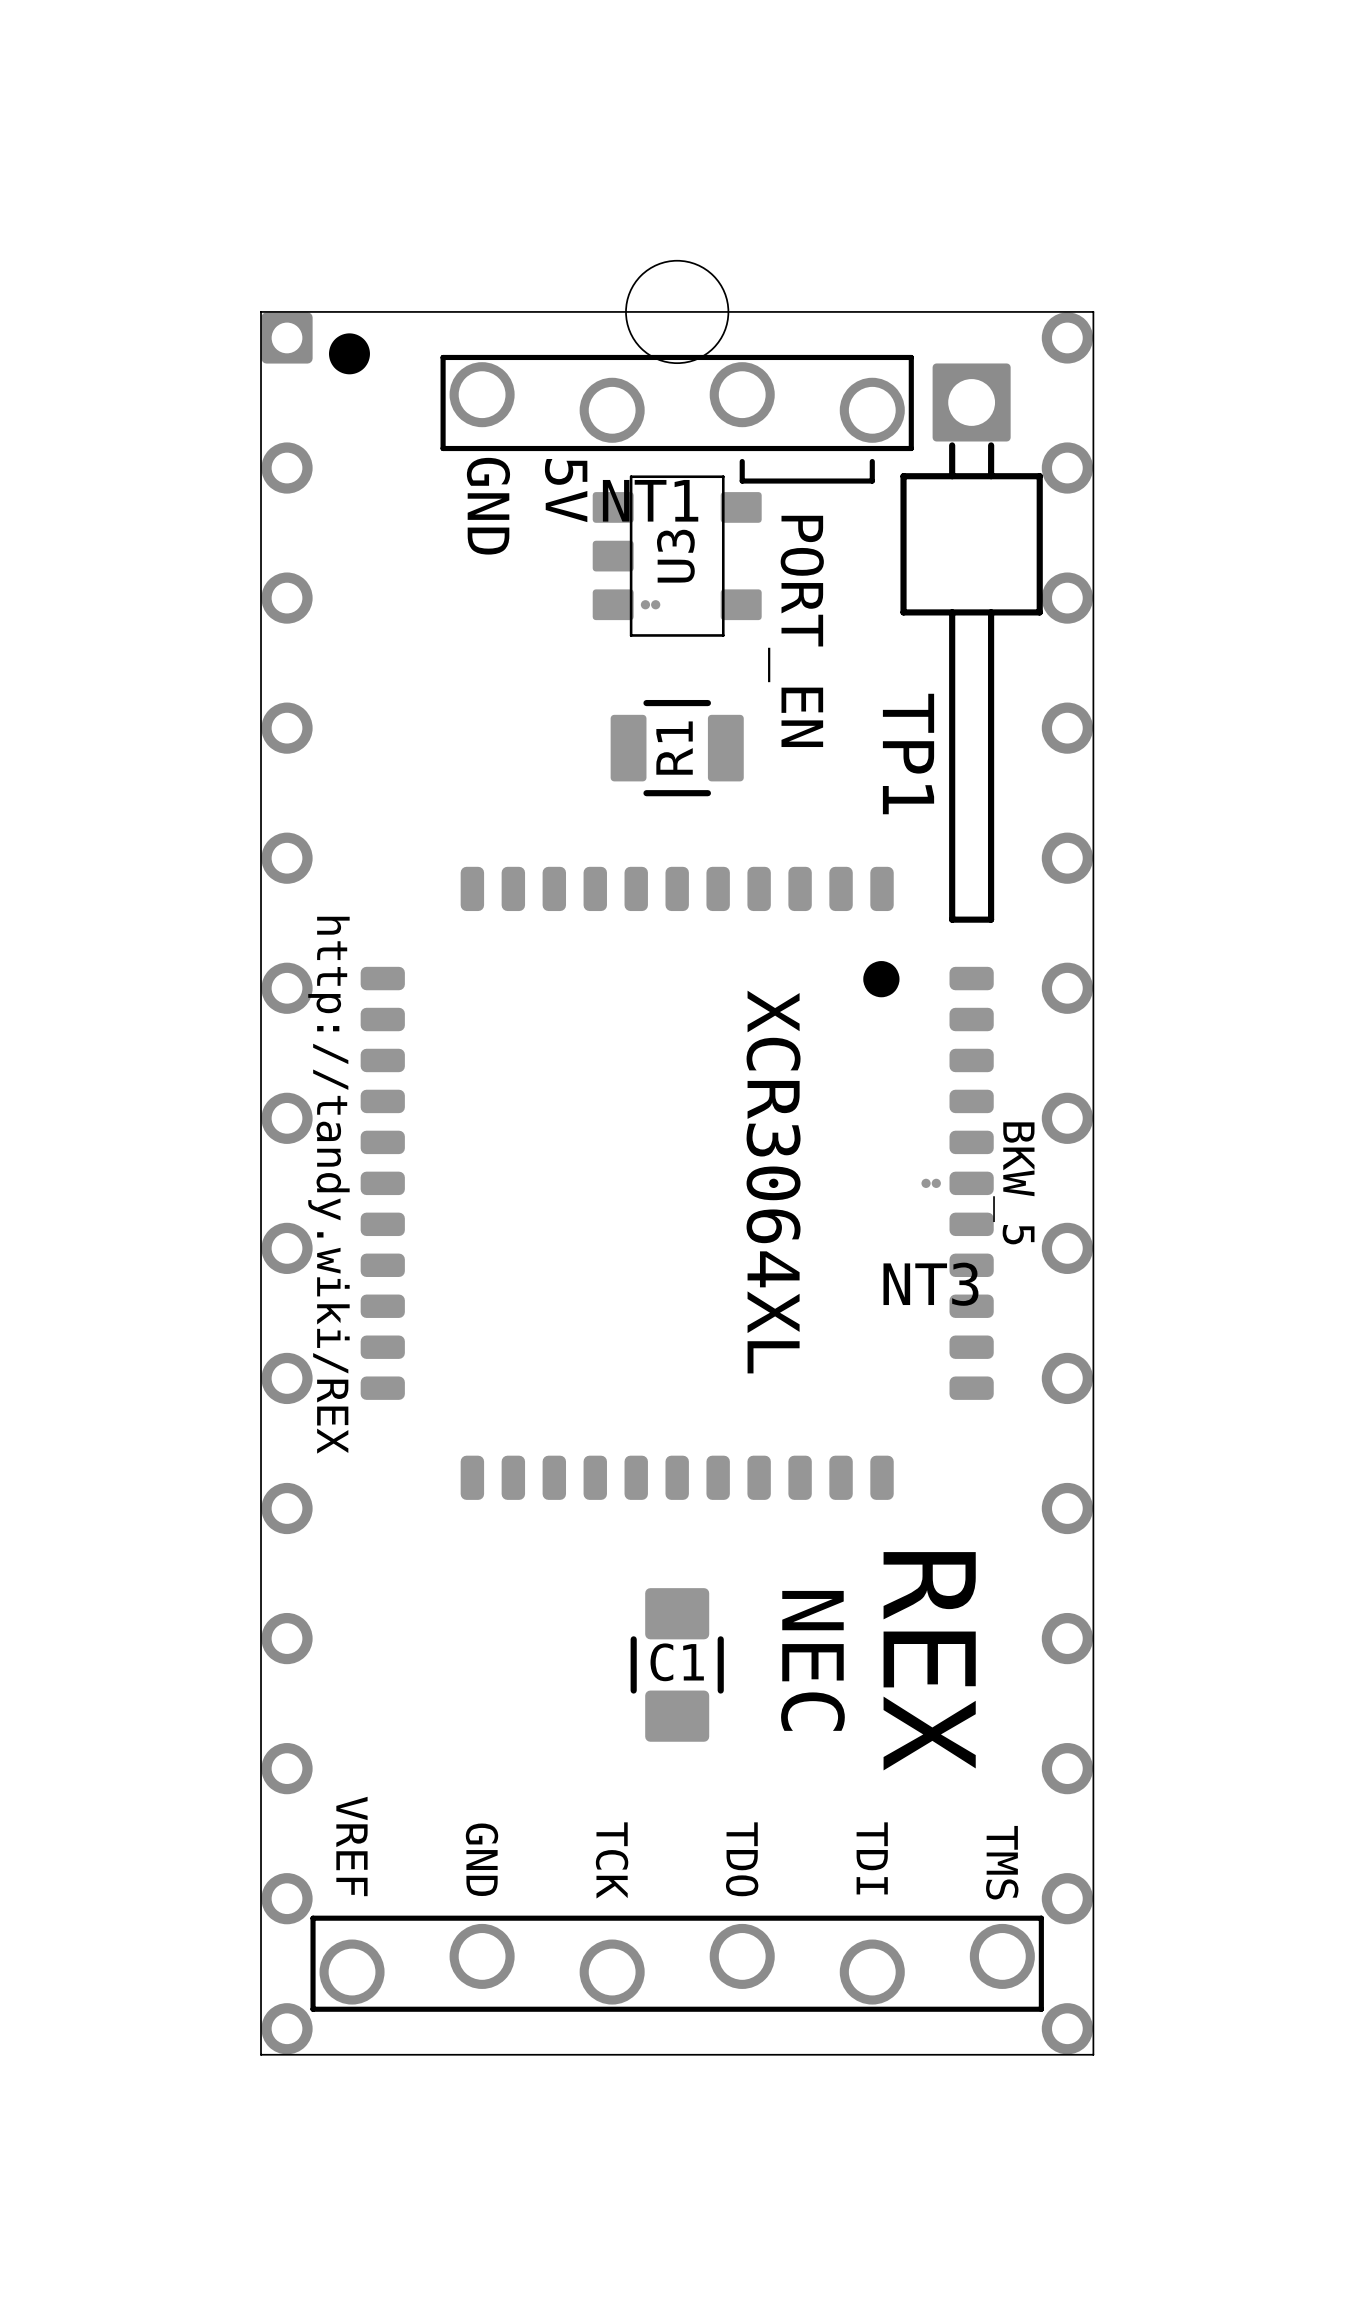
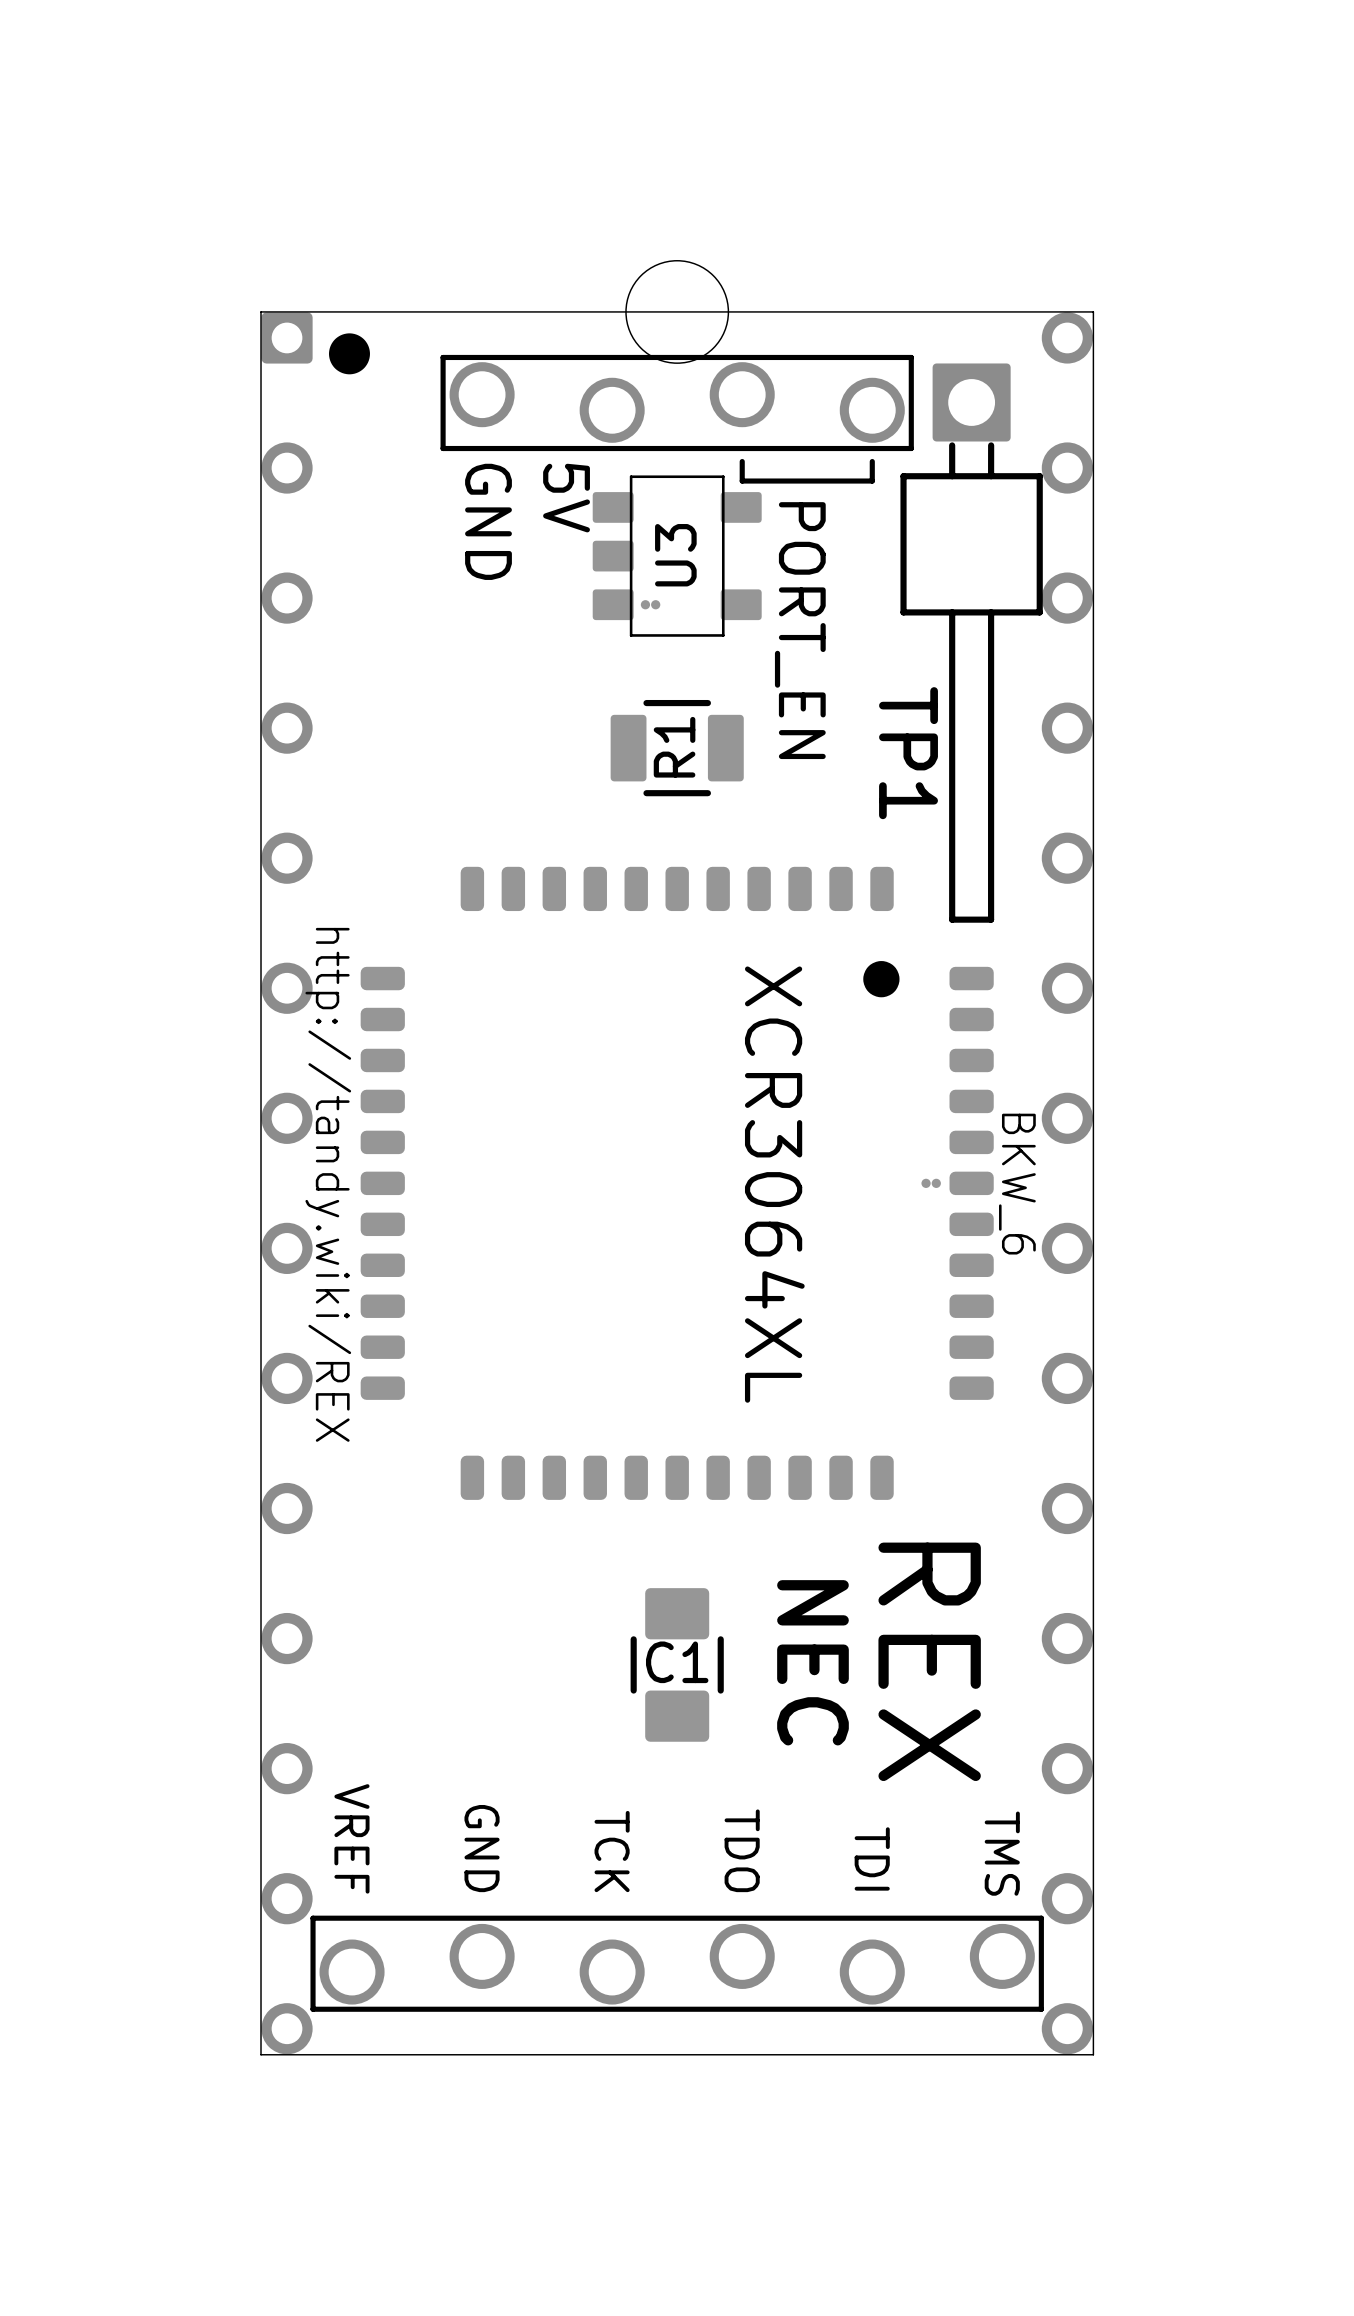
NT1 name: NT1 (650, 500) -> none
text: BKW_5 (1013, 1183) -> BKW_6 (1017, 1184)
NT3 name: NT3 (930, 1284) -> none

